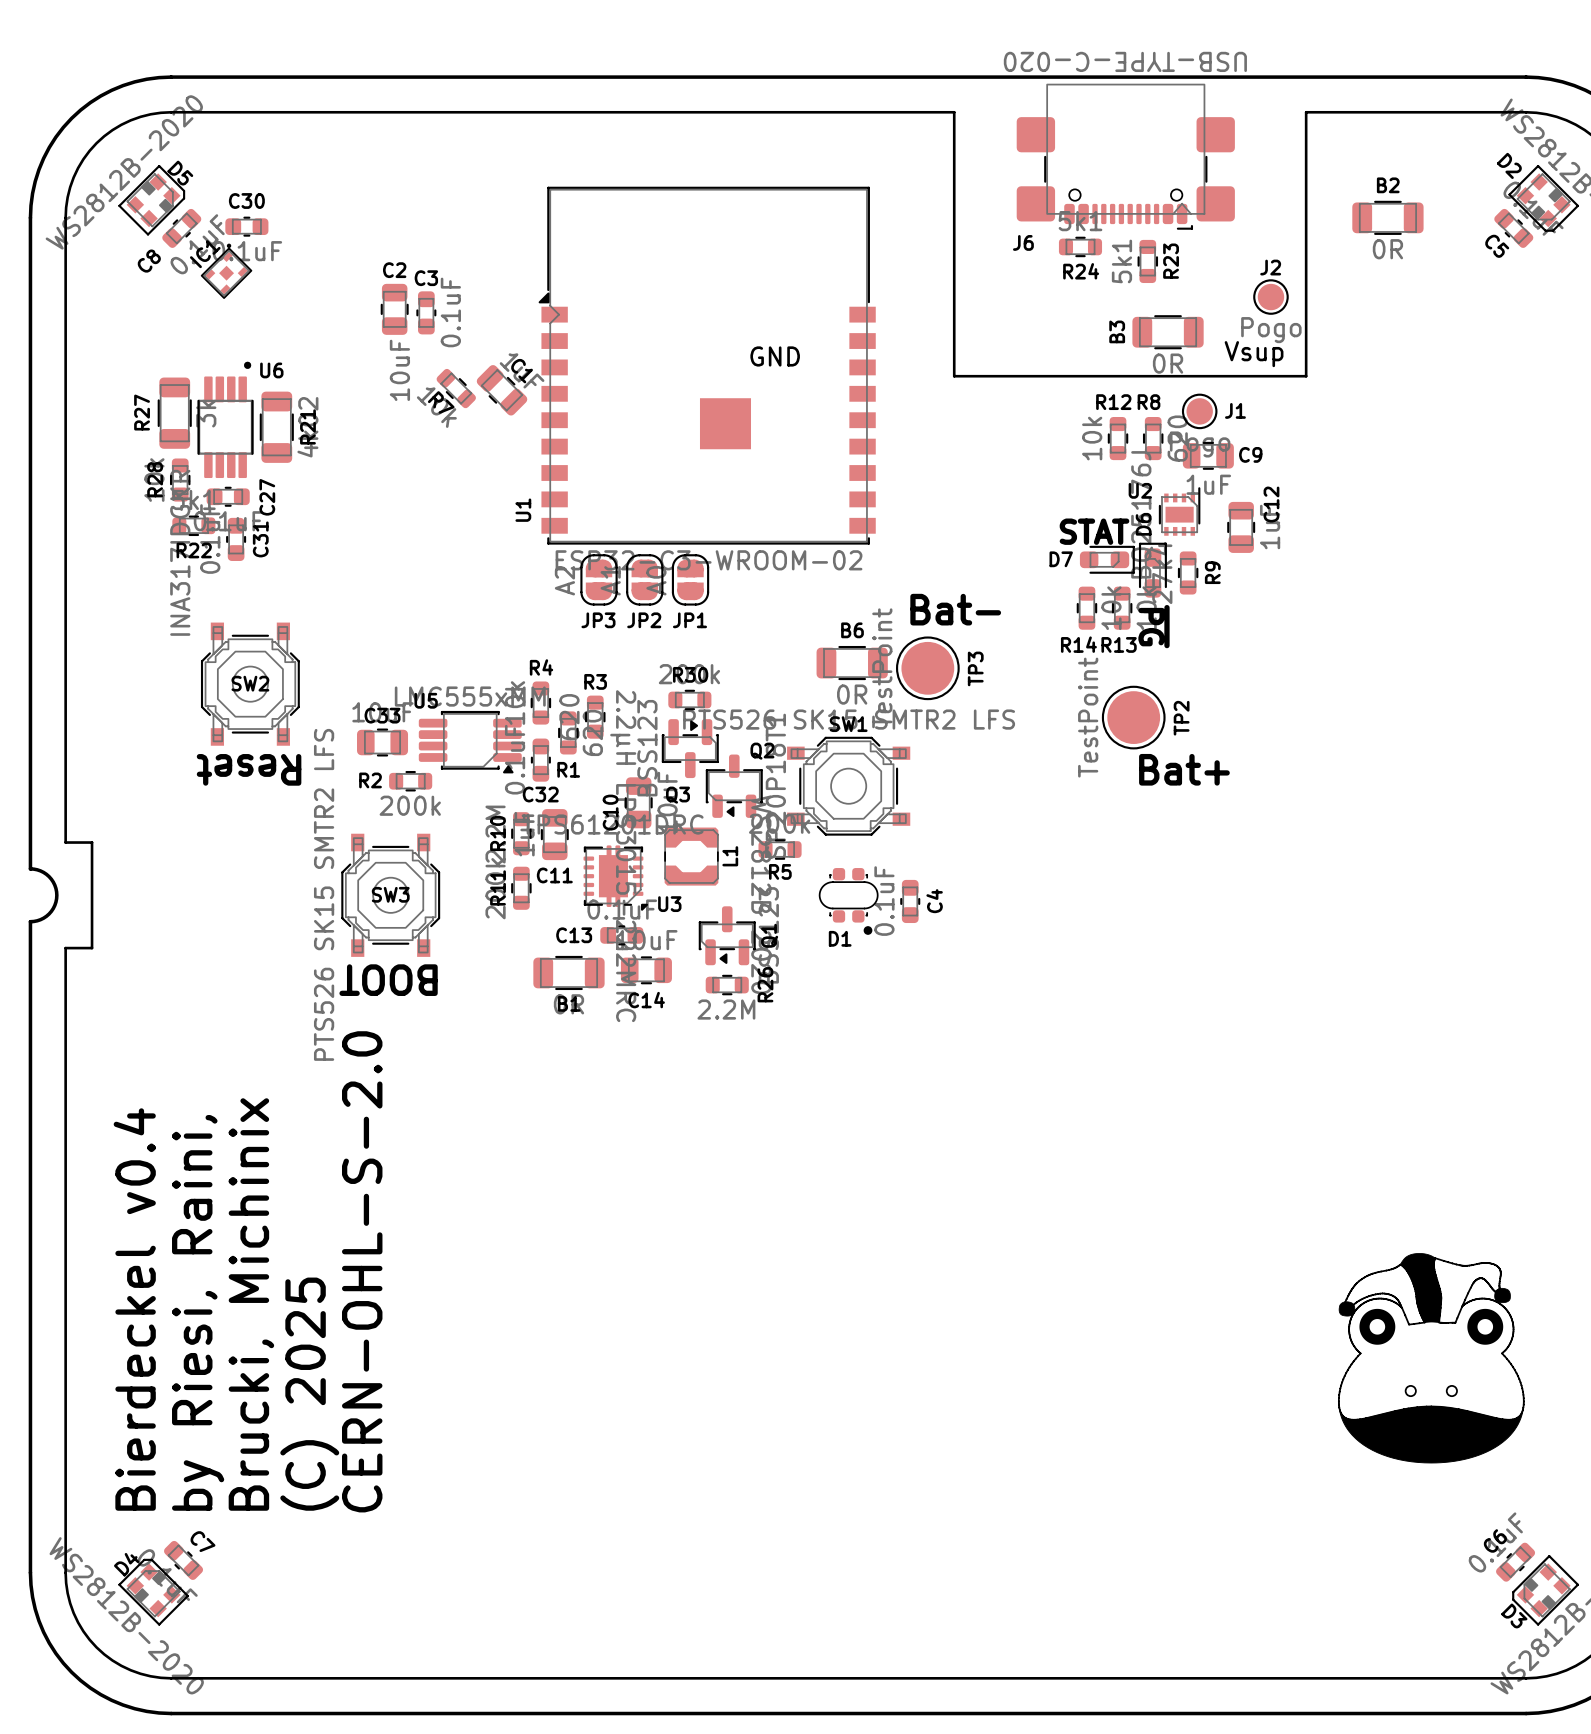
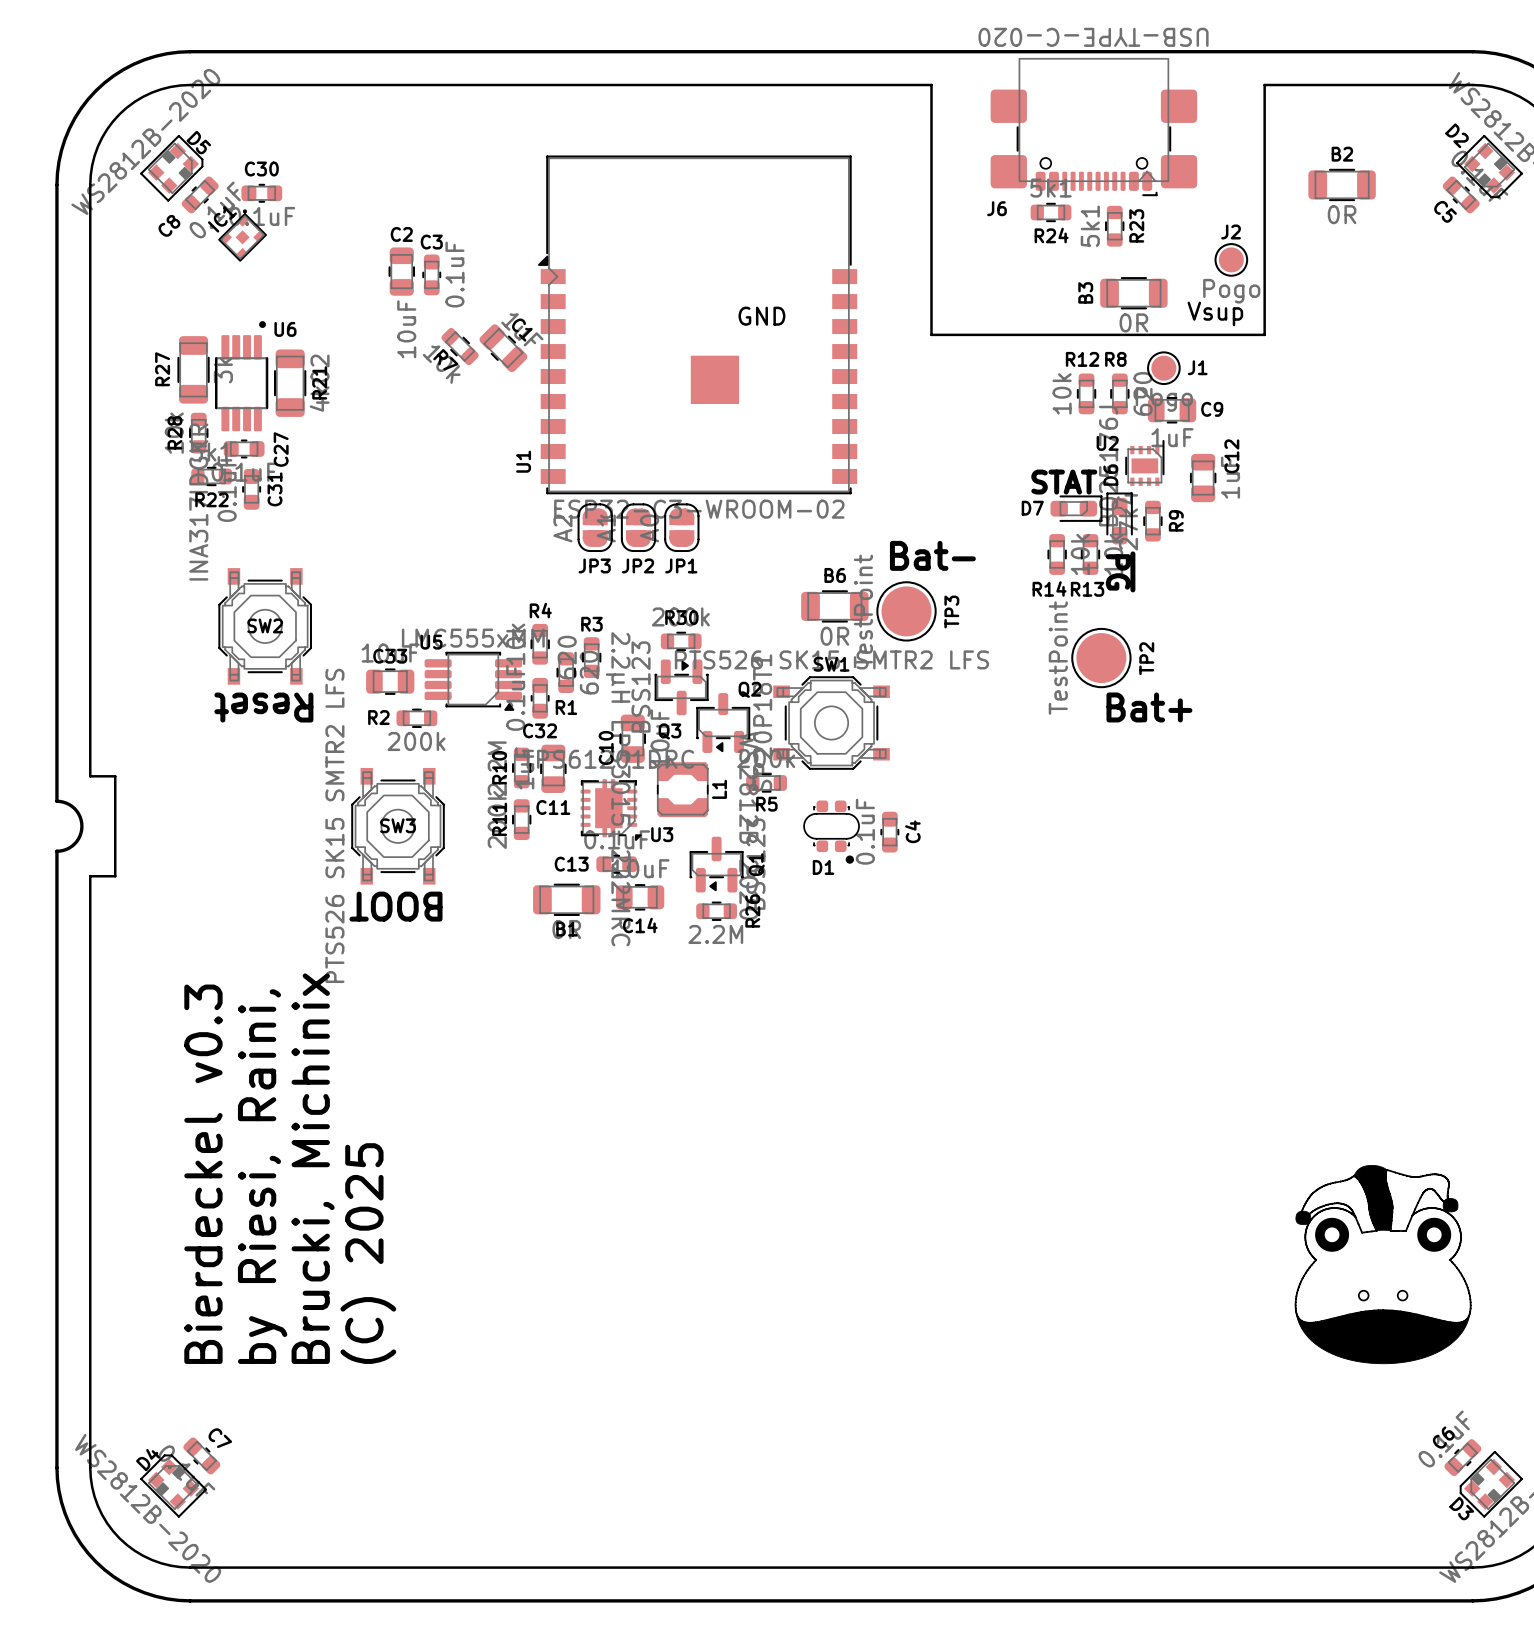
text: CERN-OHL-S-2.0 (362, 1271) -> none
text position: Brucki, Michinix (251, 1304) -> Brucki, Michinix (313, 1168)
text: Bierdeckel v0.4 (134, 1309) -> Bierdeckel v0.3 (203, 1174)
text position: by Riesi, Raini, (198, 1312) -> by Riesi, Raini, (262, 1176)
text position: (C) 2025 (309, 1394) -> (C) 2025 (368, 1253)

